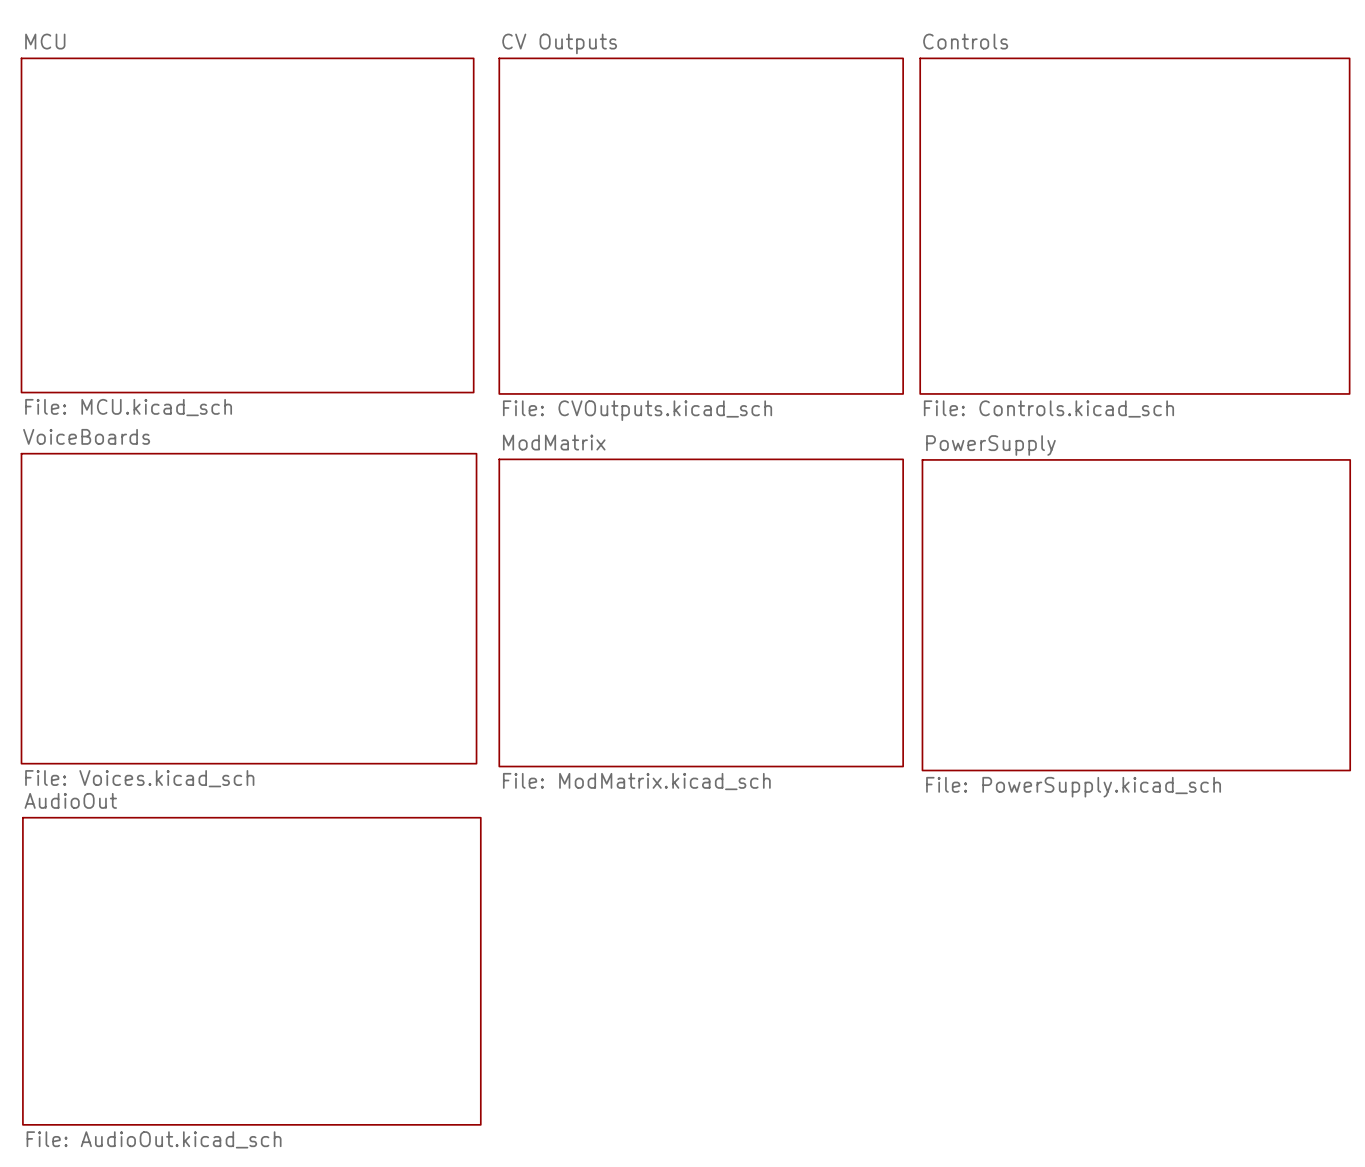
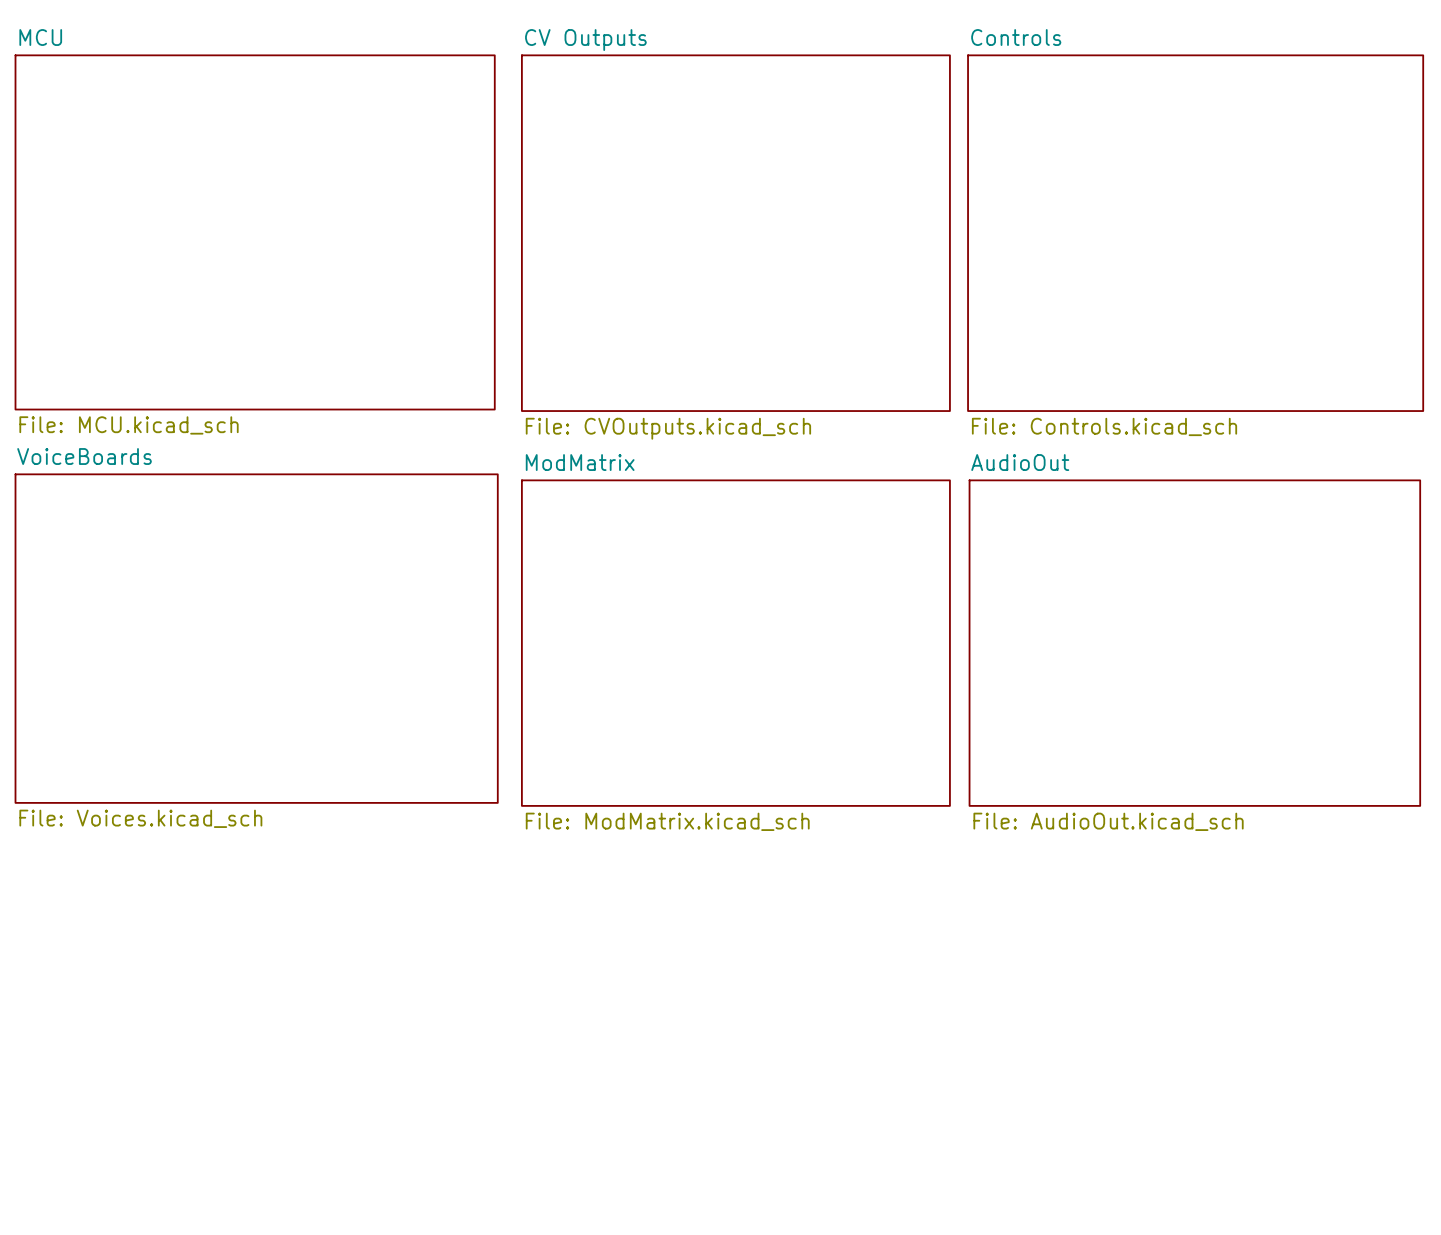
sheet AudioOut: none -> File: AudioOut.kicad_sch (1194, 643)
sheet PowerSupply: File: PowerSupply.kicad_sch (1136, 615) -> none
sheet AudioOut: File: AudioOut.kicad_sch (251, 971) -> none

